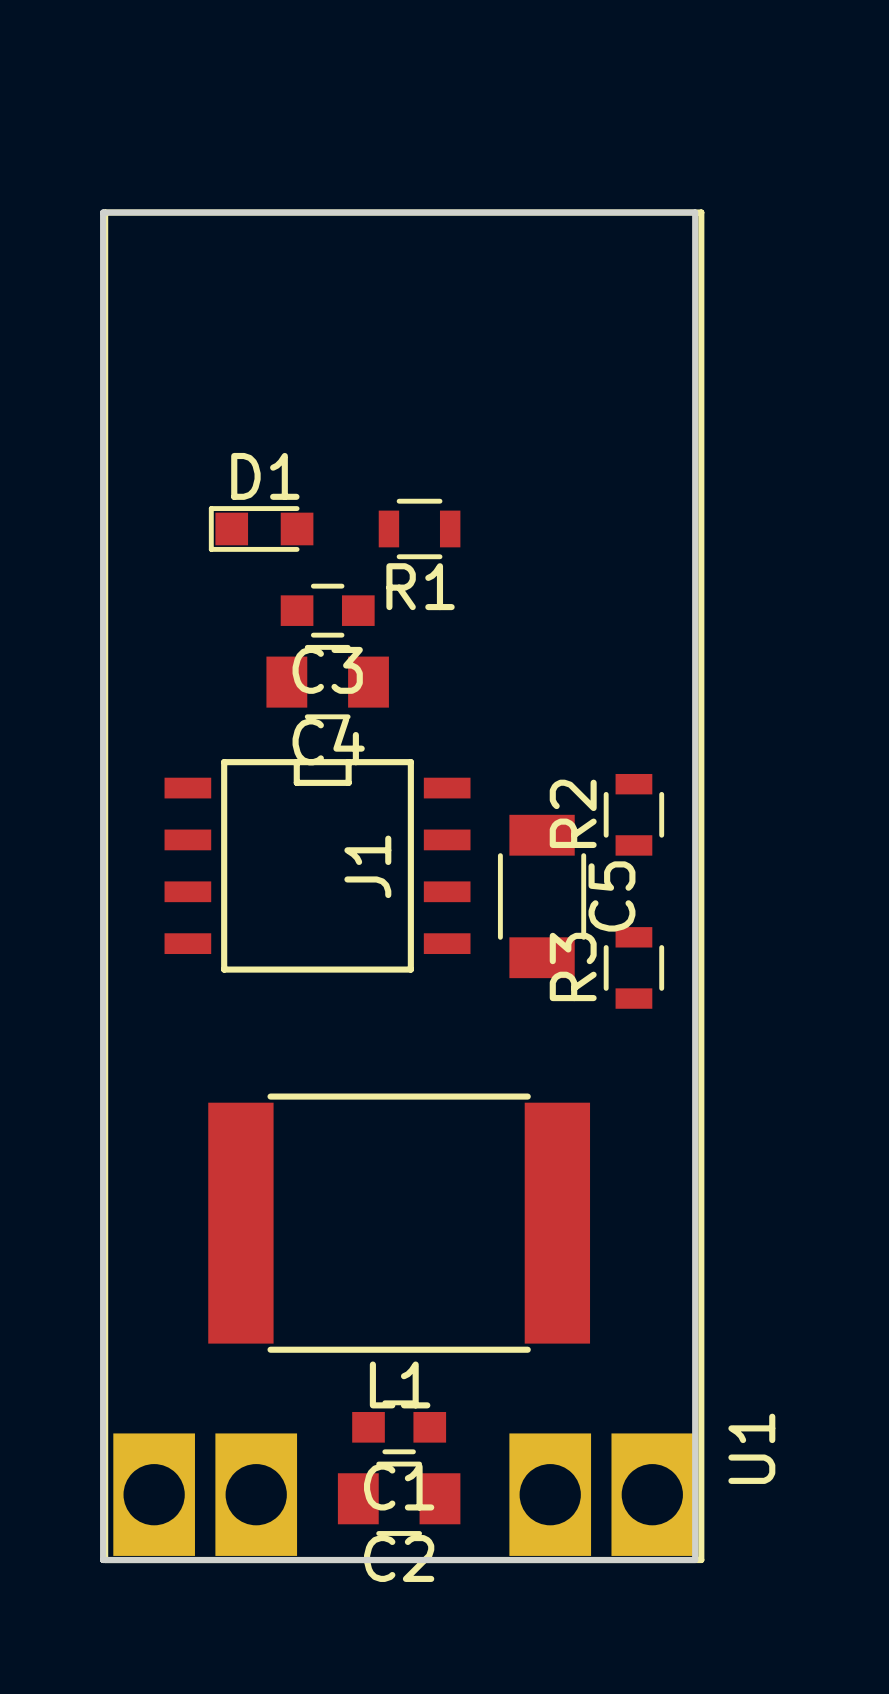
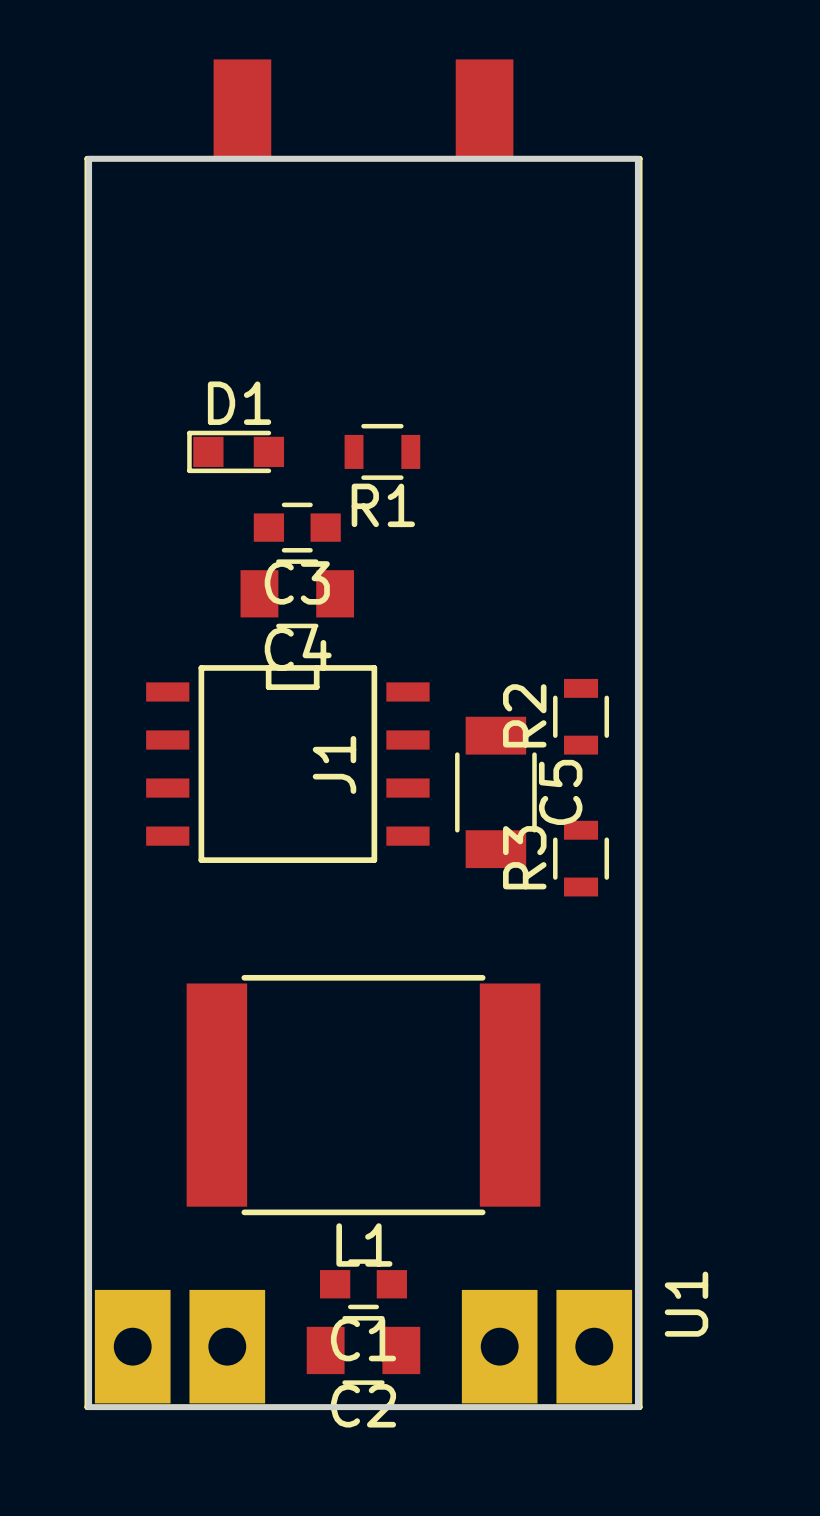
U1 footprint: [102, 209, 705, 1564] -> [84, 59, 643, 1411]

